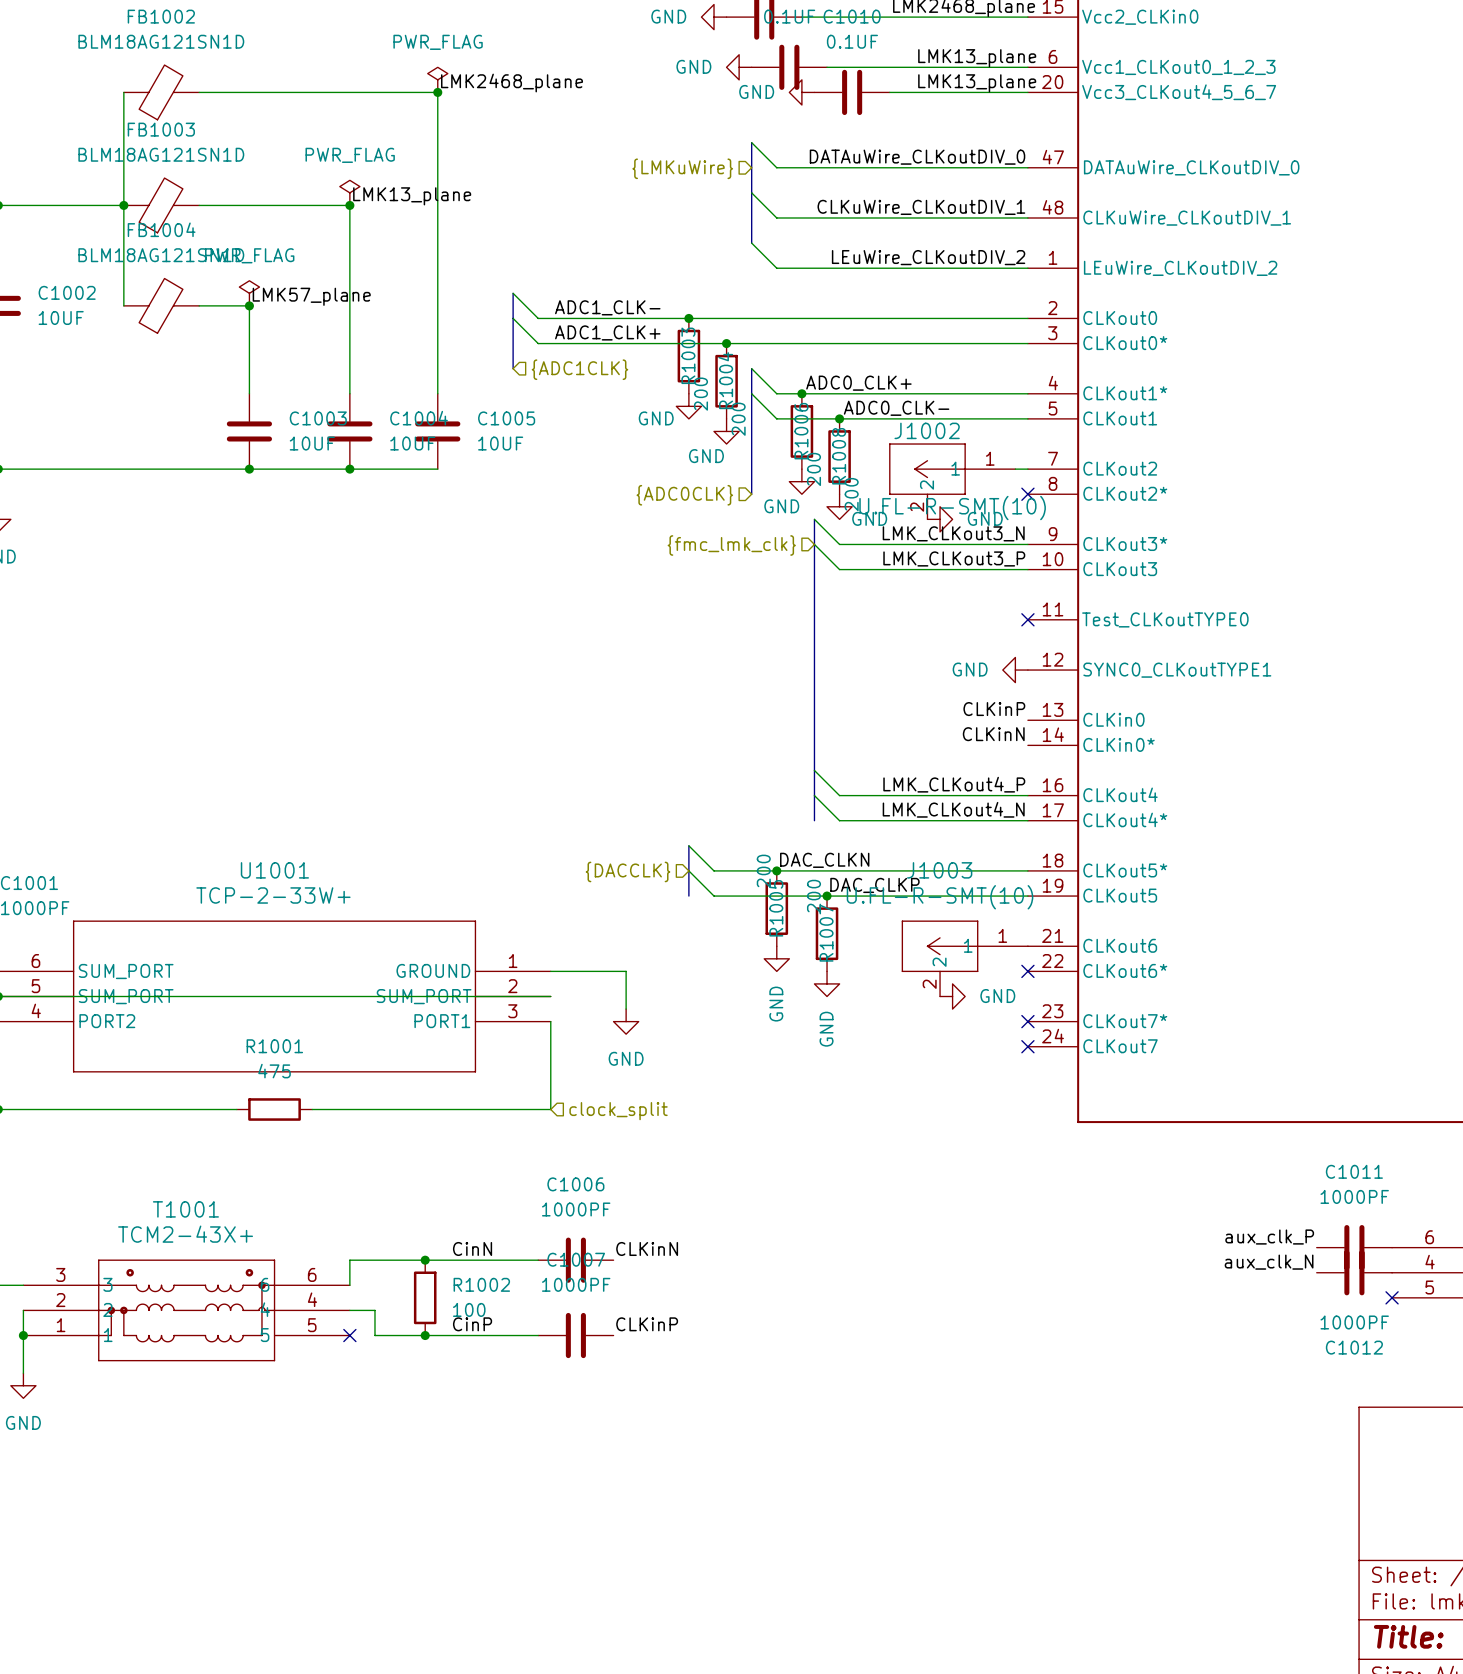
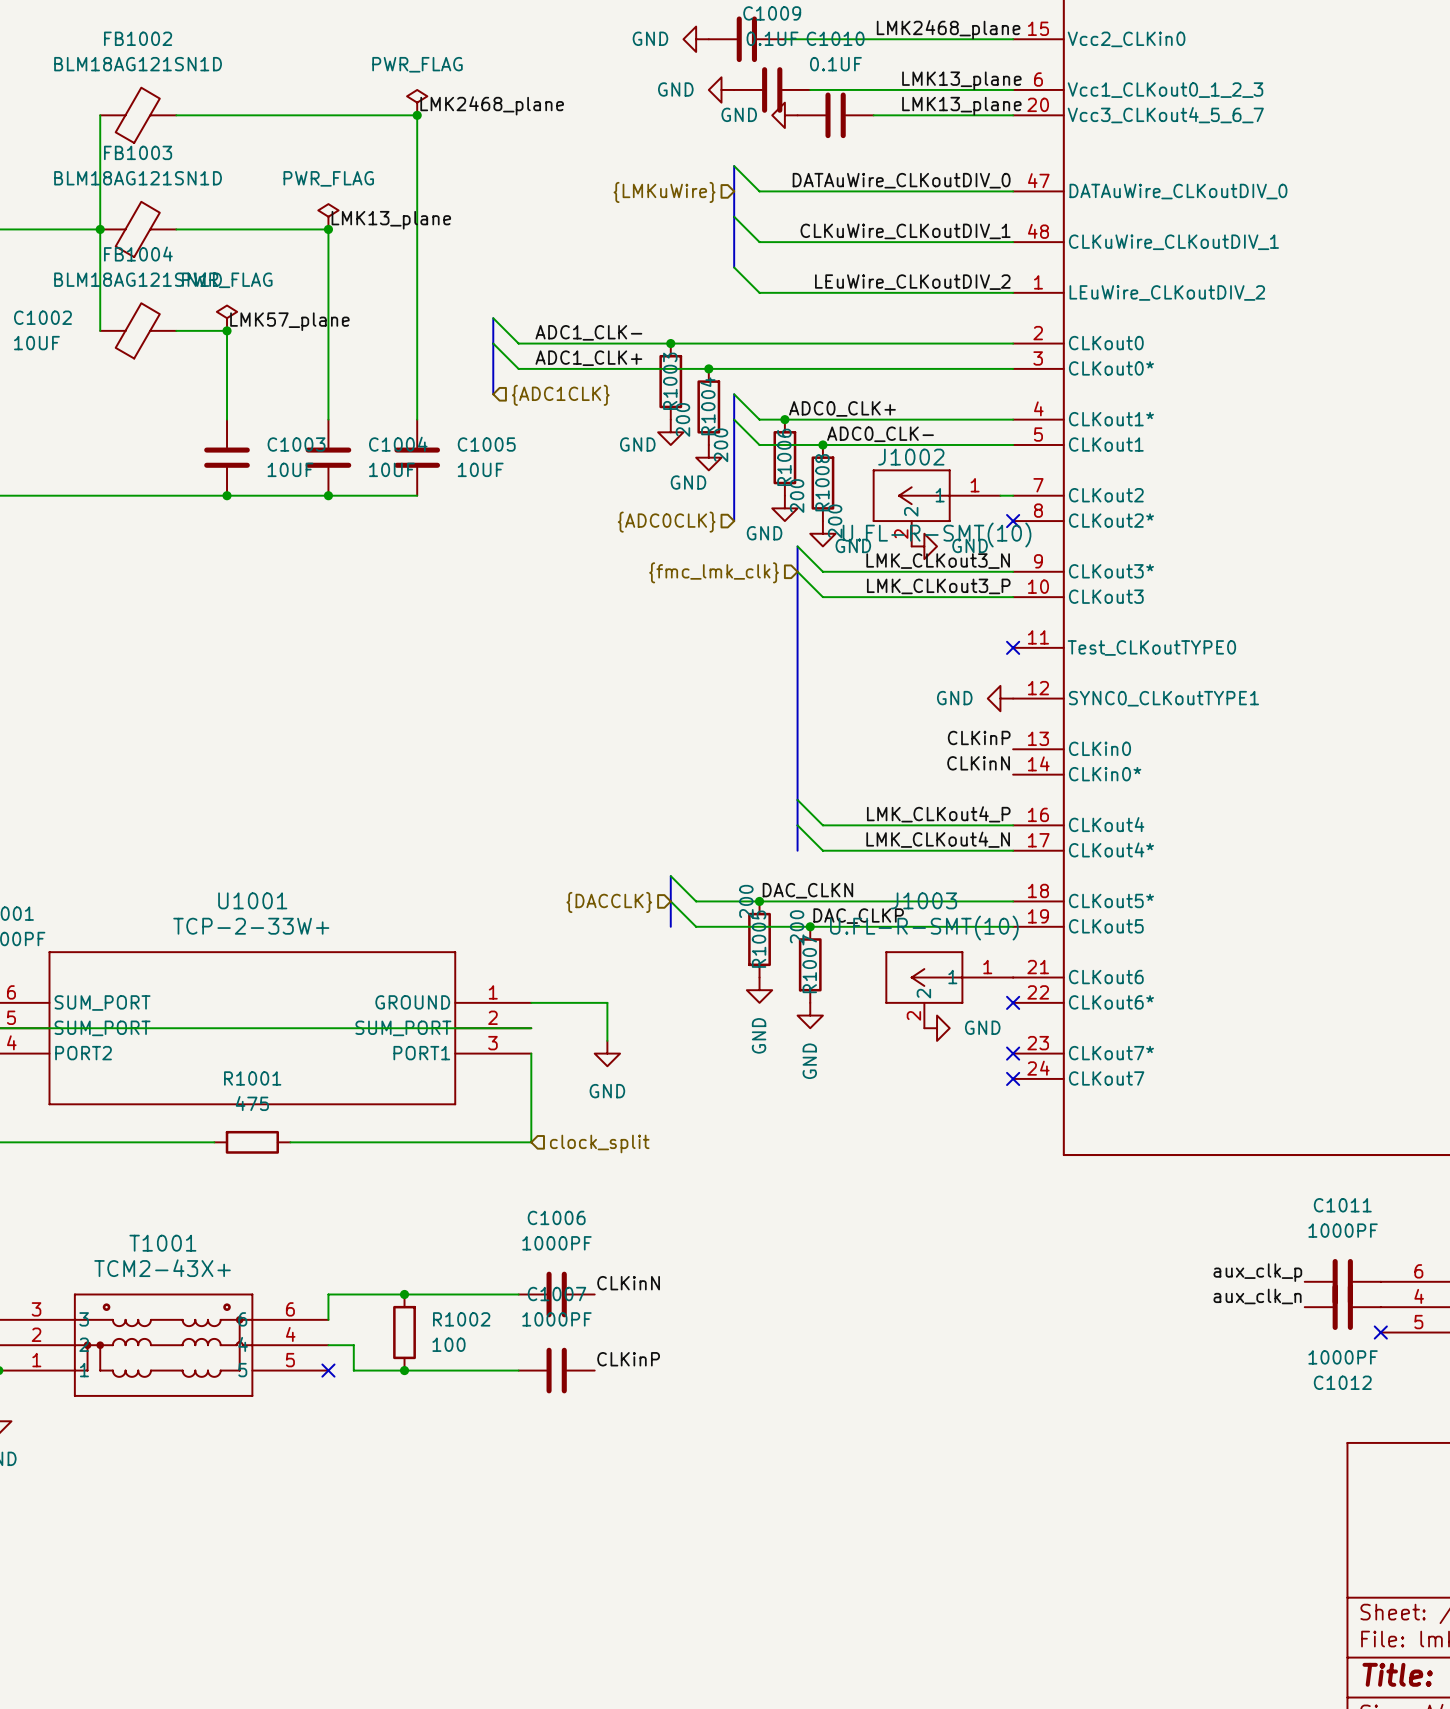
label: aux_clk_P (1269, 1237) -> aux_clk_p (1257, 1272)
label: CinN (472, 1248) -> none
label: aux_clk_N (1269, 1262) -> aux_clk_n (1257, 1296)
label: CinP (472, 1324) -> none

